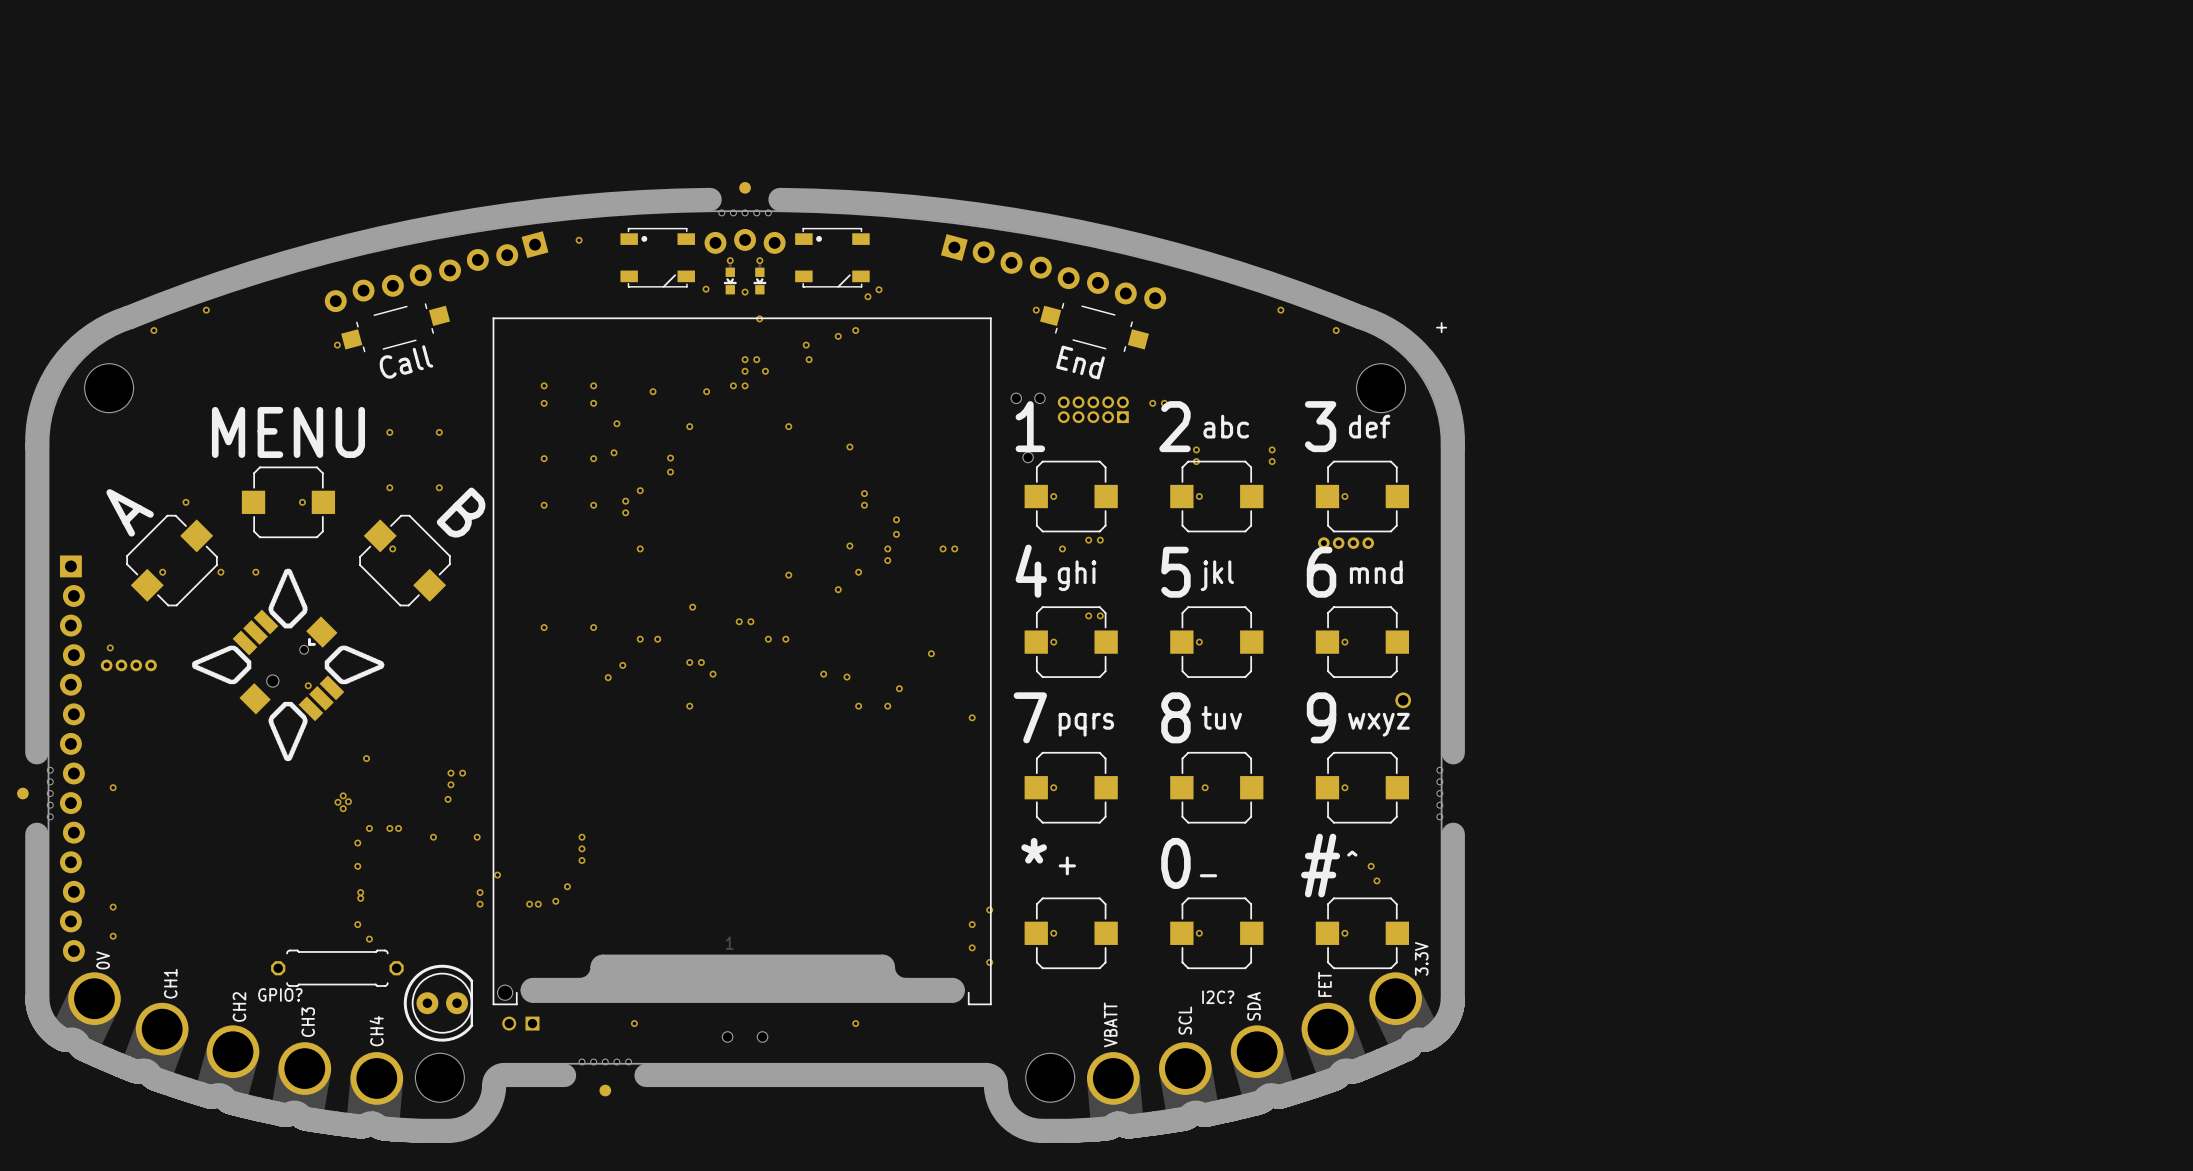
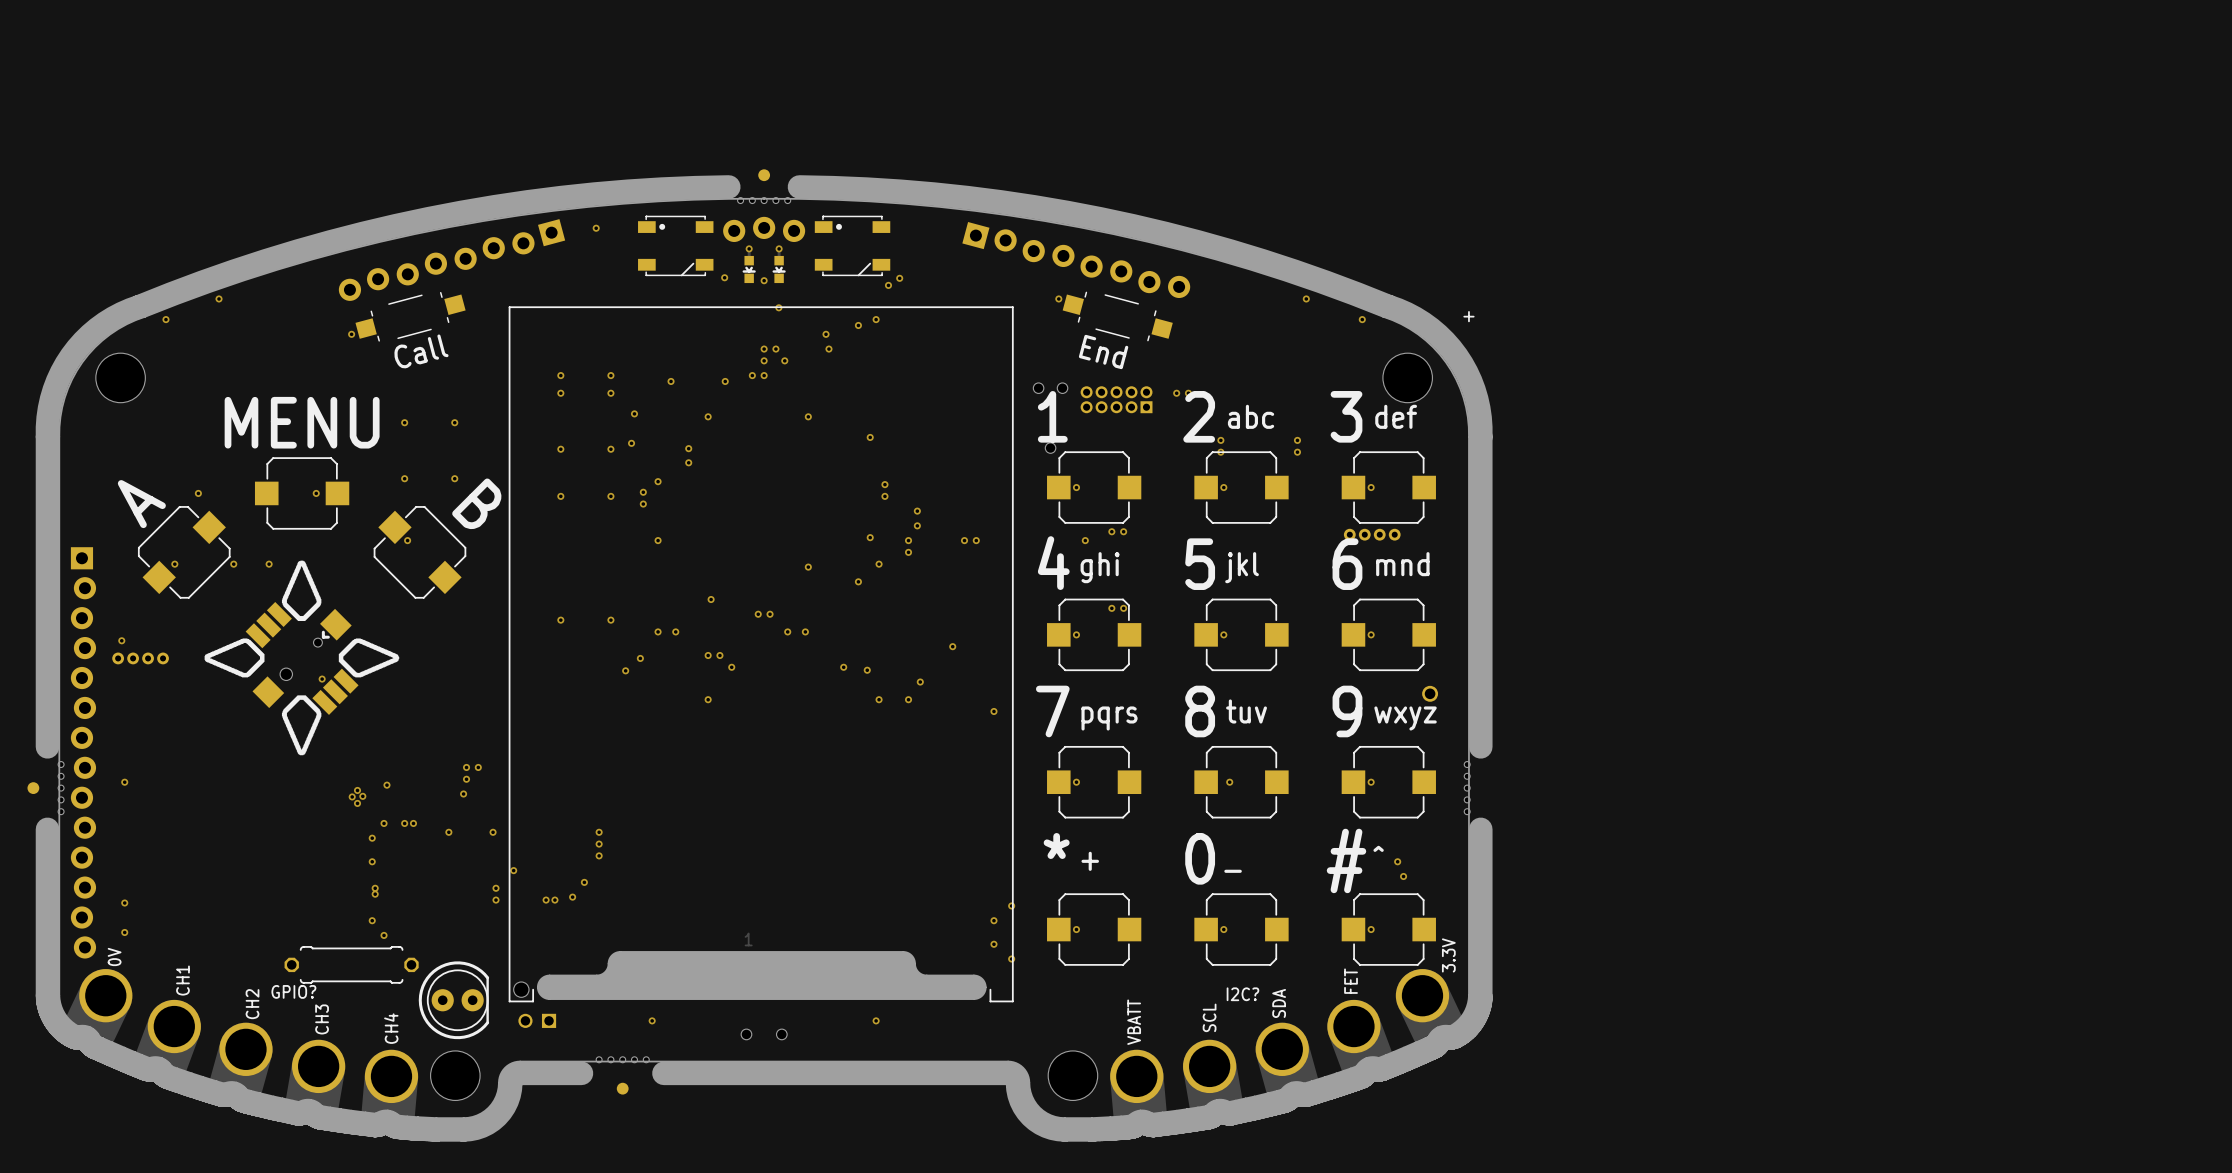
via position: (366, 758) -> (386, 785)

